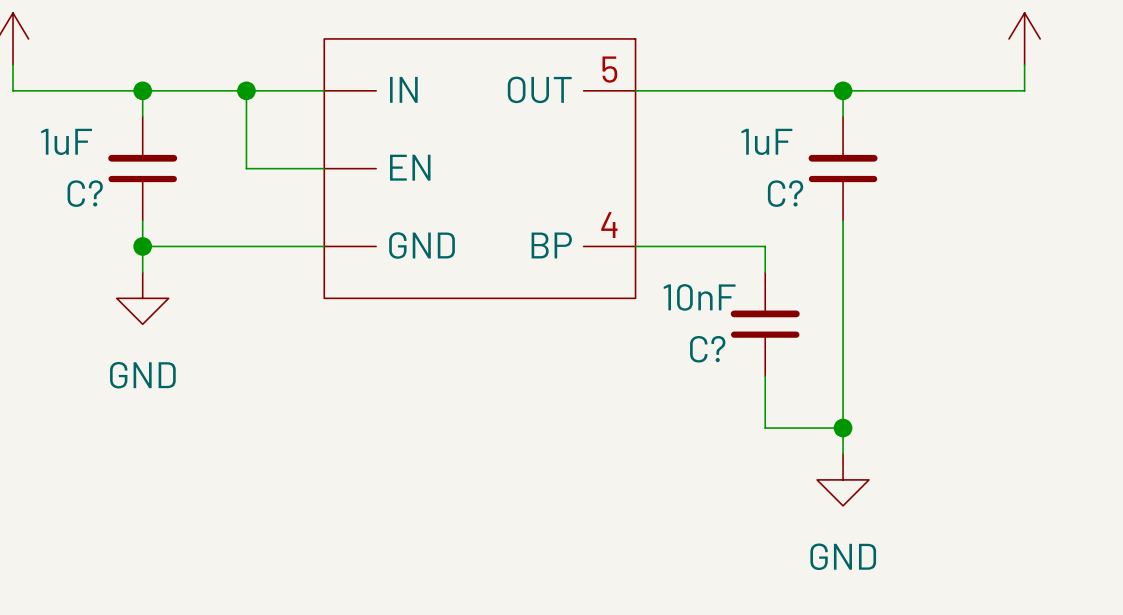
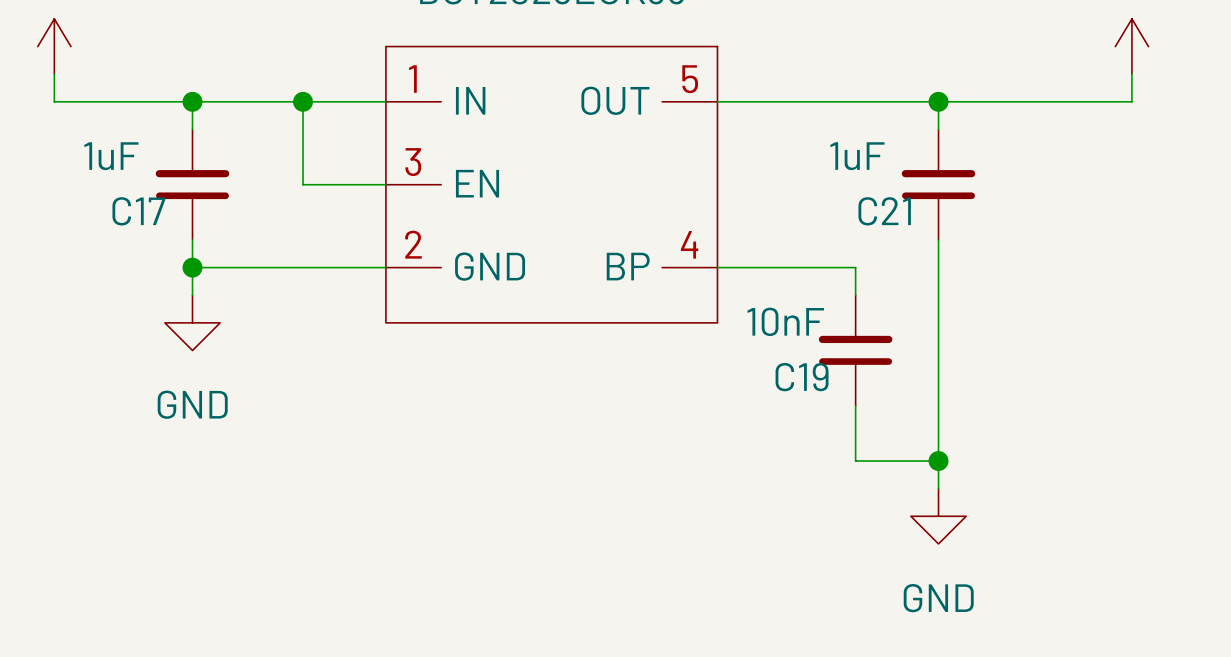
part pin number: none -> 1 (412, 79)
part pin number: none -> 3 (413, 162)
C? name: C? (85, 193) -> C17 (138, 211)
C? name: C? (785, 193) -> C21 (884, 211)
part pin number: none -> 2 (413, 244)
C? name: C? (707, 349) -> C19 (802, 377)

